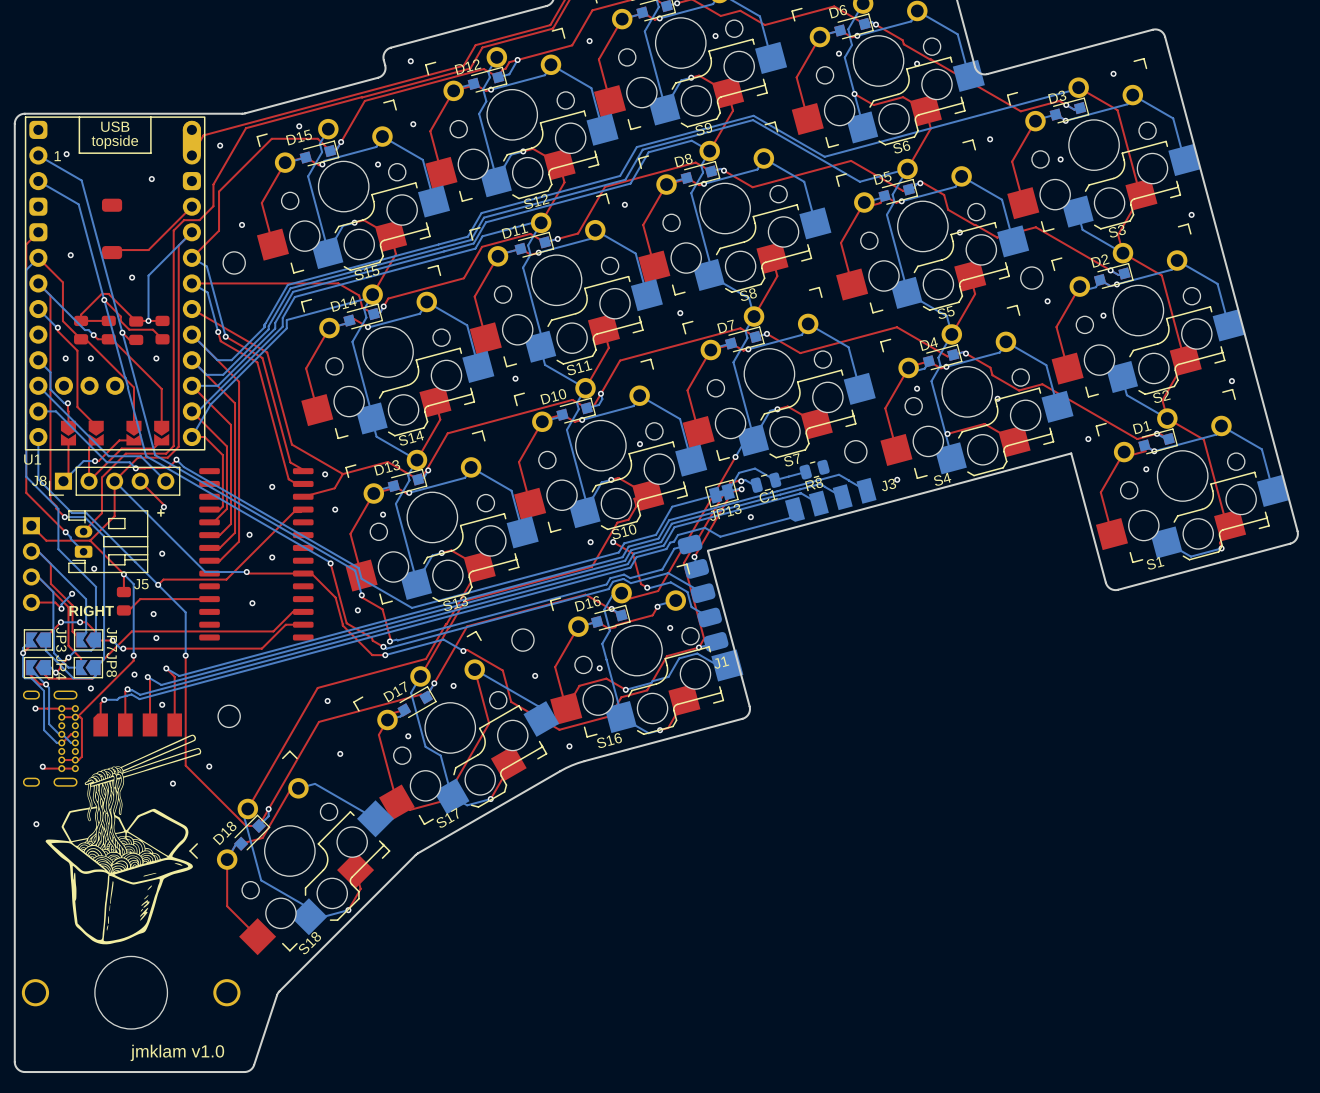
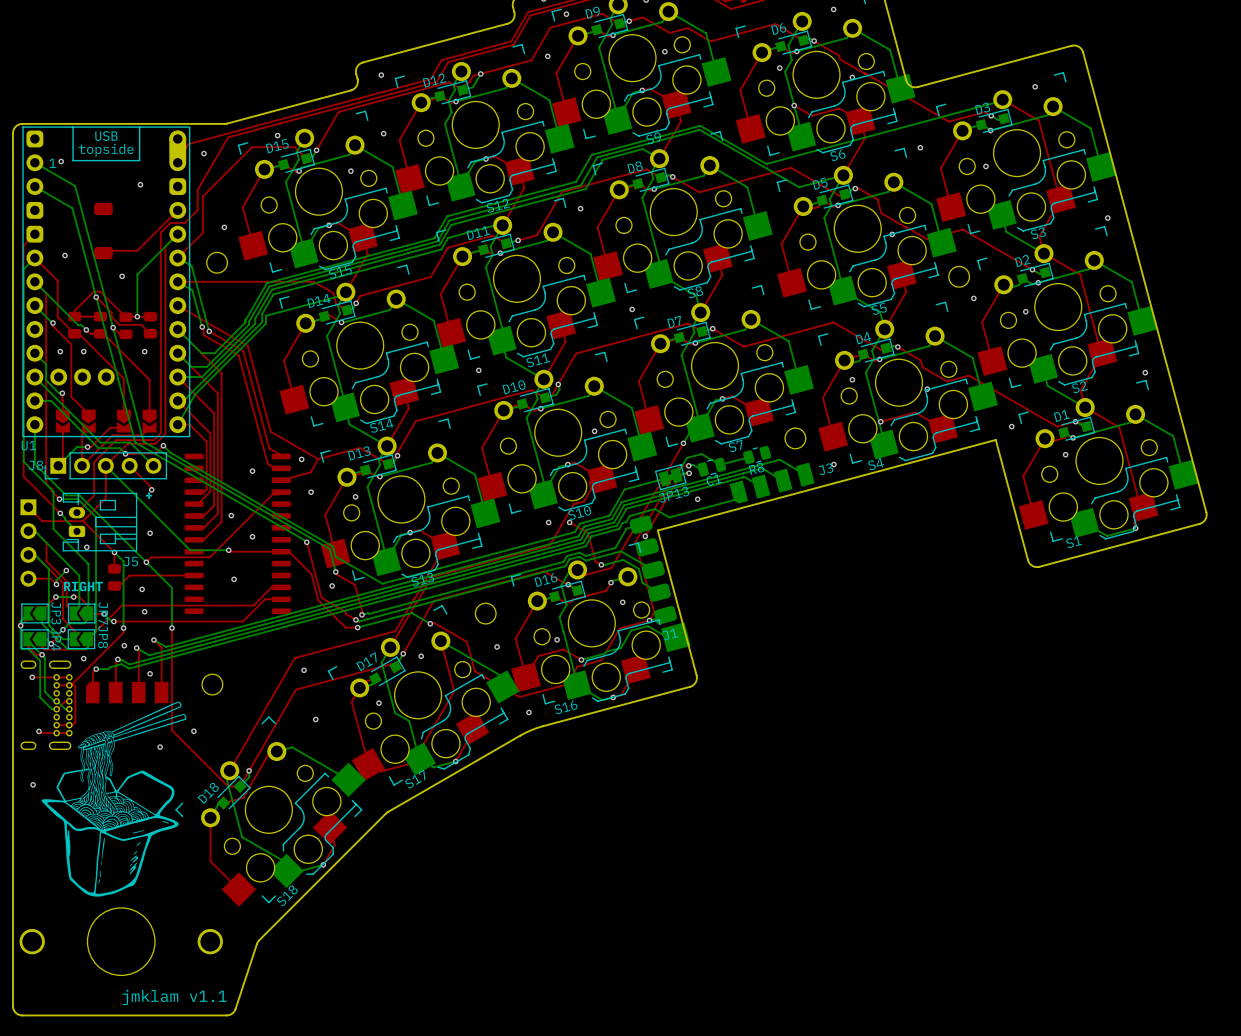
text: jmklam v1.0 (177, 1052) -> jmklam v1.1 (174, 997)

